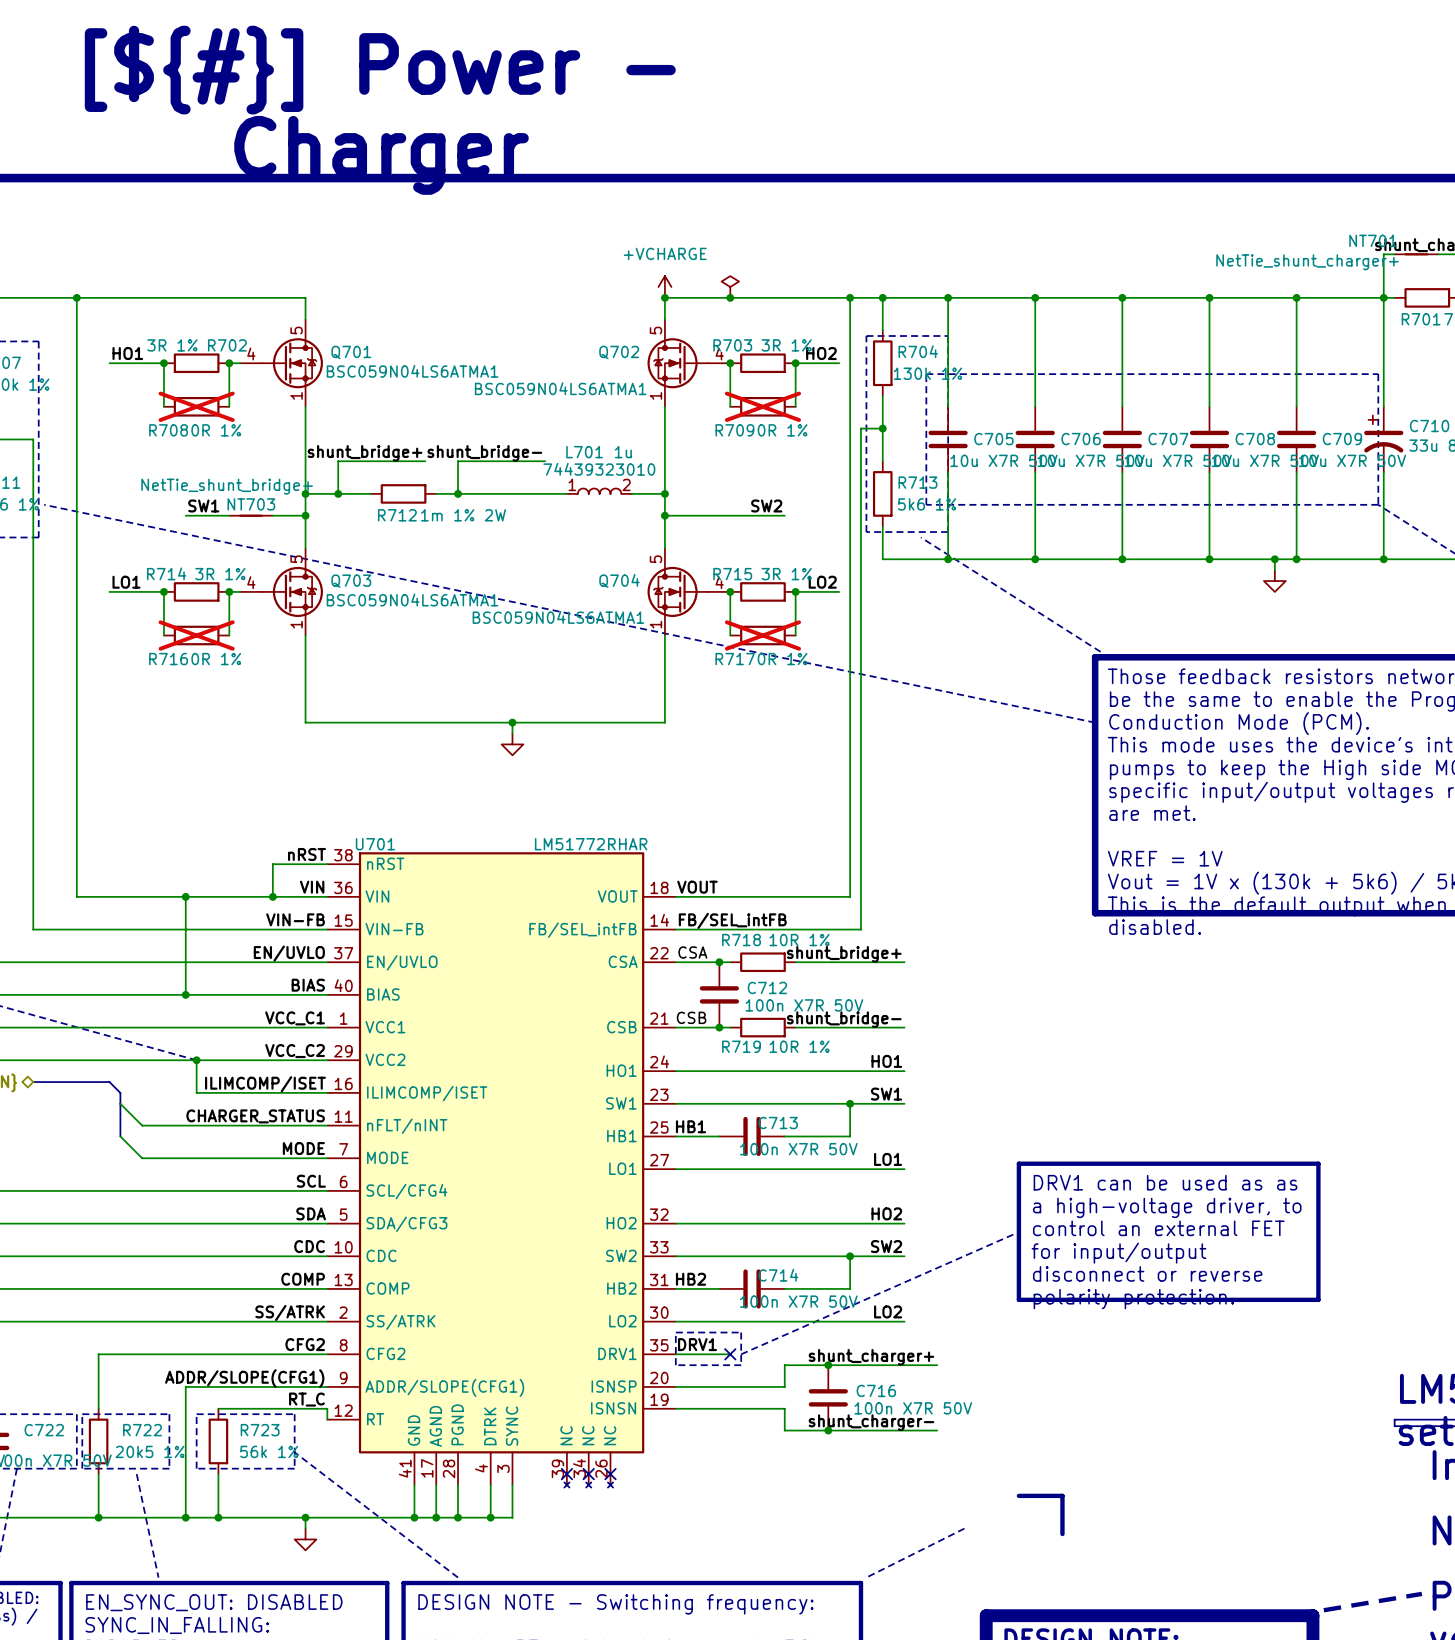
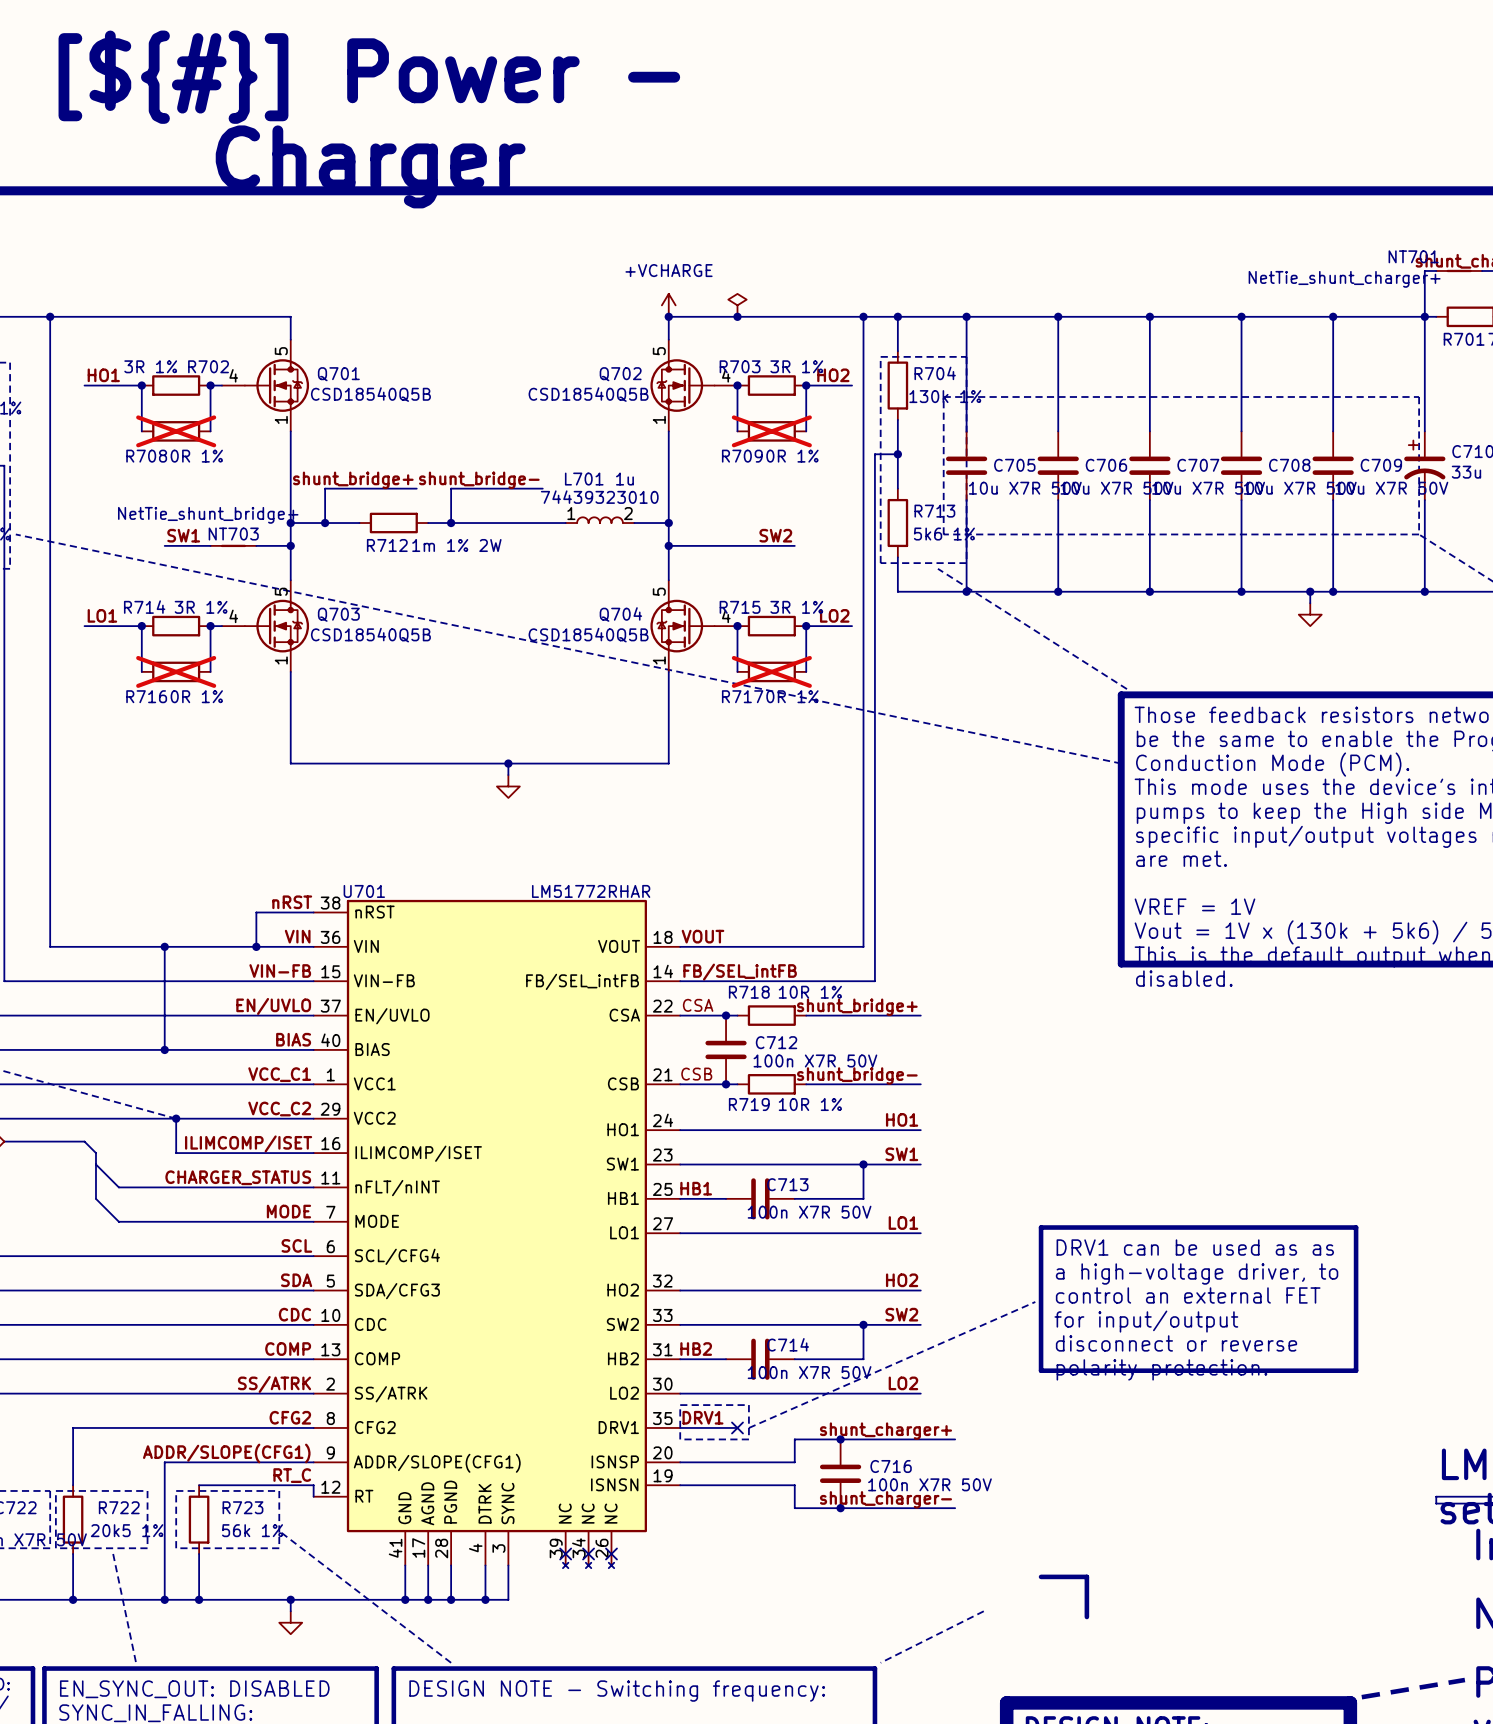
Q701 value: BSC059N04LS6ATMA1 (412, 371) -> CSD18540Q5B (370, 394)
Q702 value: BSC059N04LS6ATMA1 (560, 388) -> CSD18540Q5B (588, 394)
Q703 value: BSC059N04LS6ATMA1 (412, 599) -> CSD18540Q5B (370, 635)
Q704 value: BSC059N04LS6ATMA1 (558, 617) -> CSD18540Q5B (588, 635)

